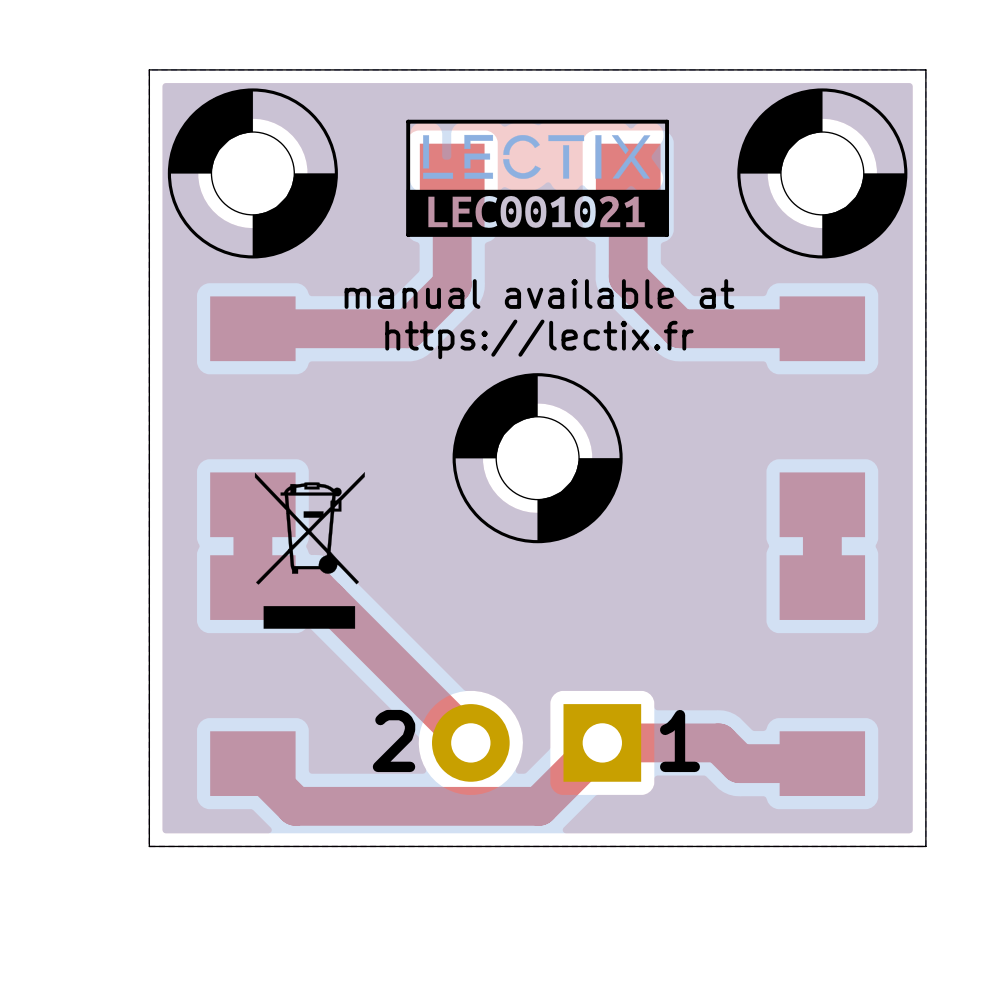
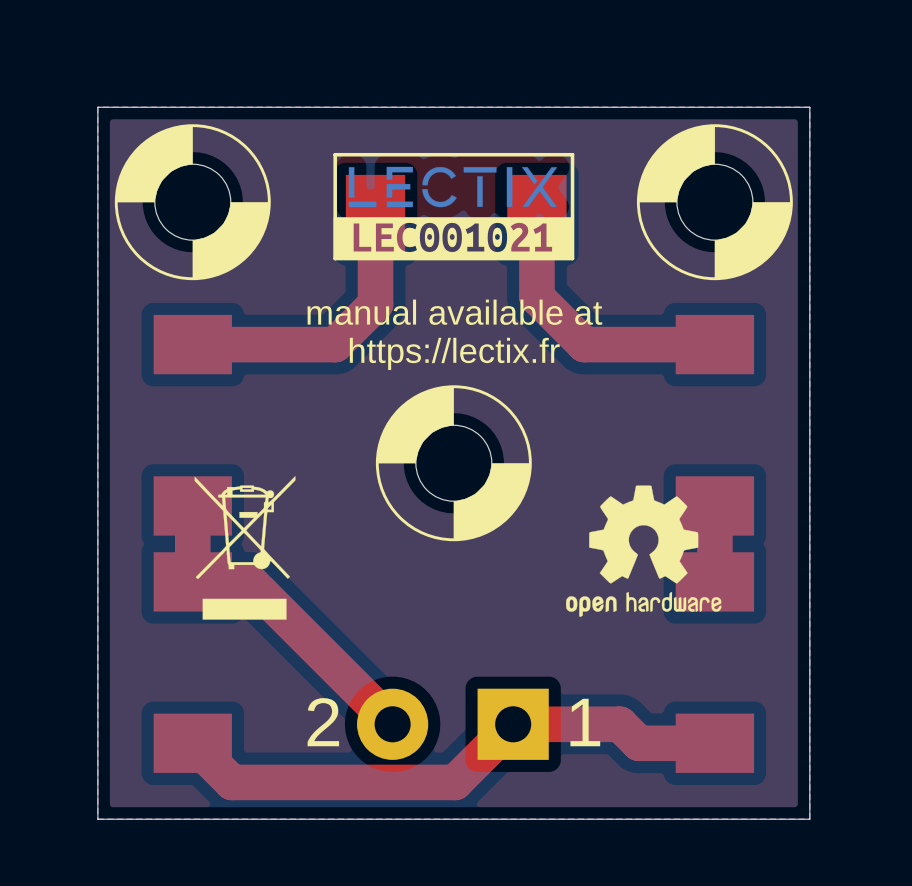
drawing: none -> [566, 485, 722, 617]

